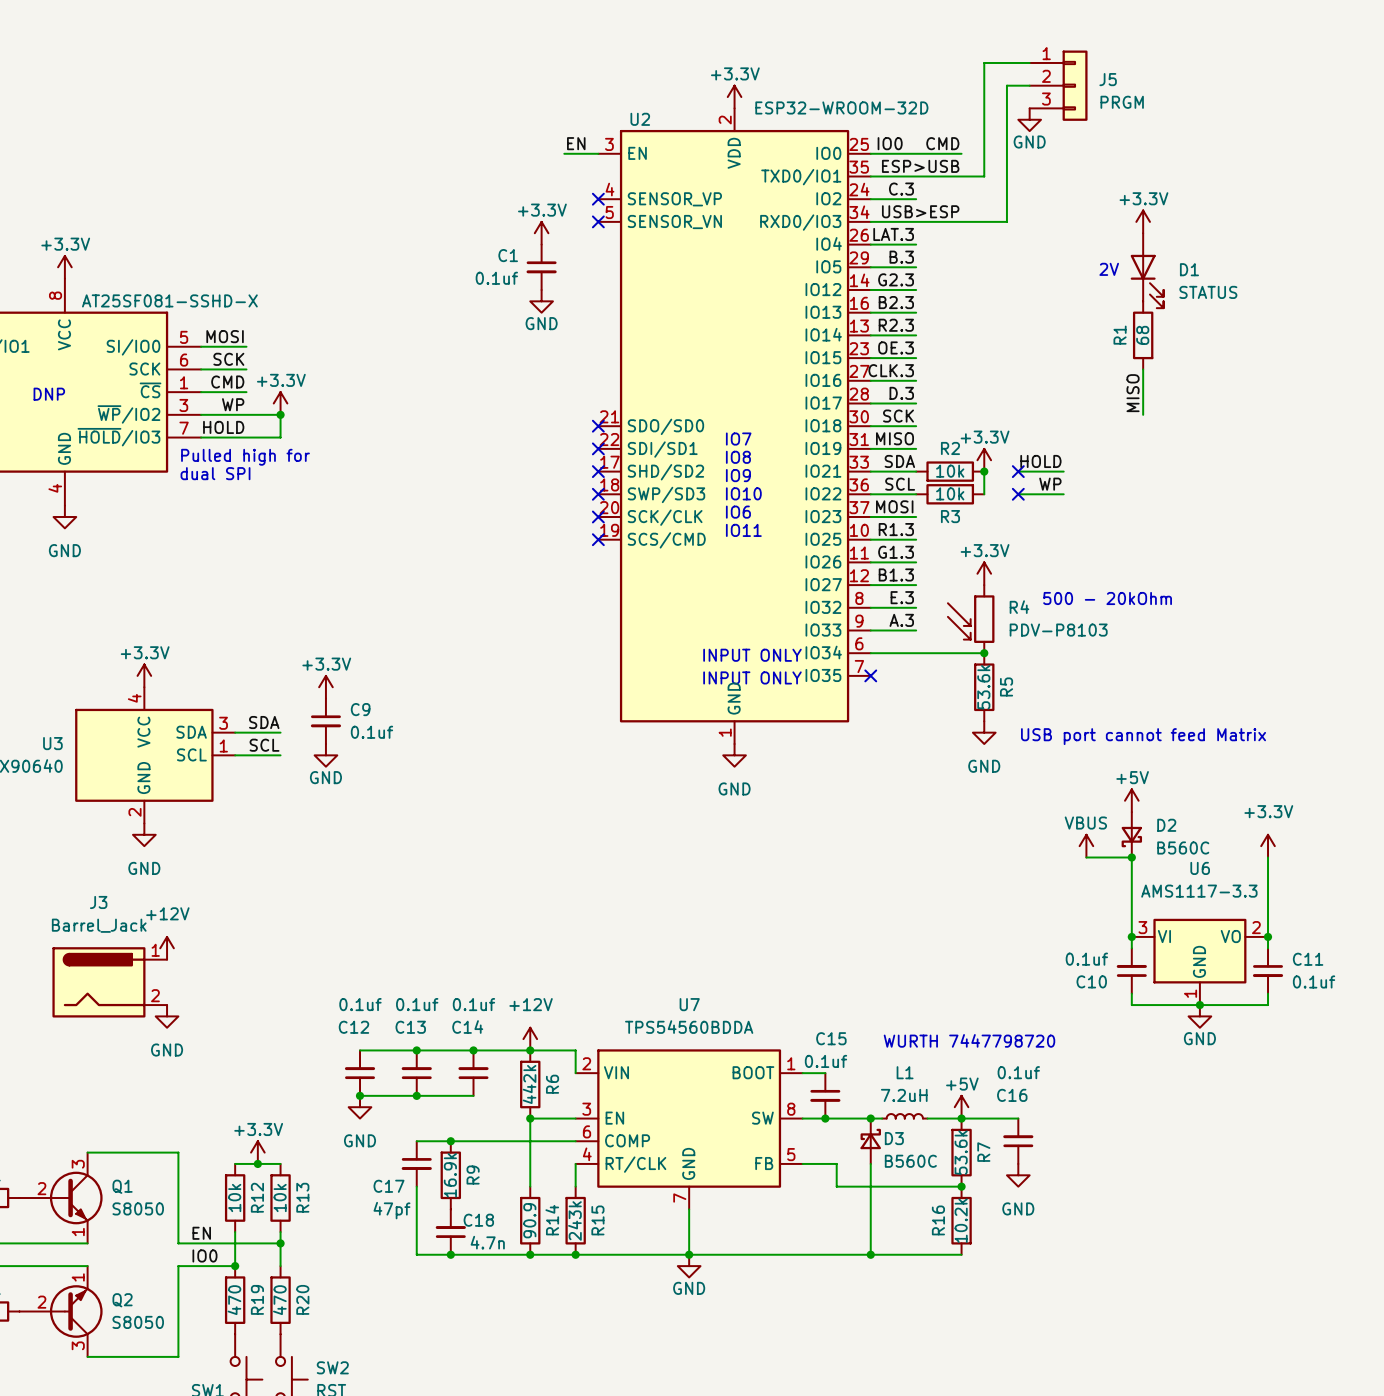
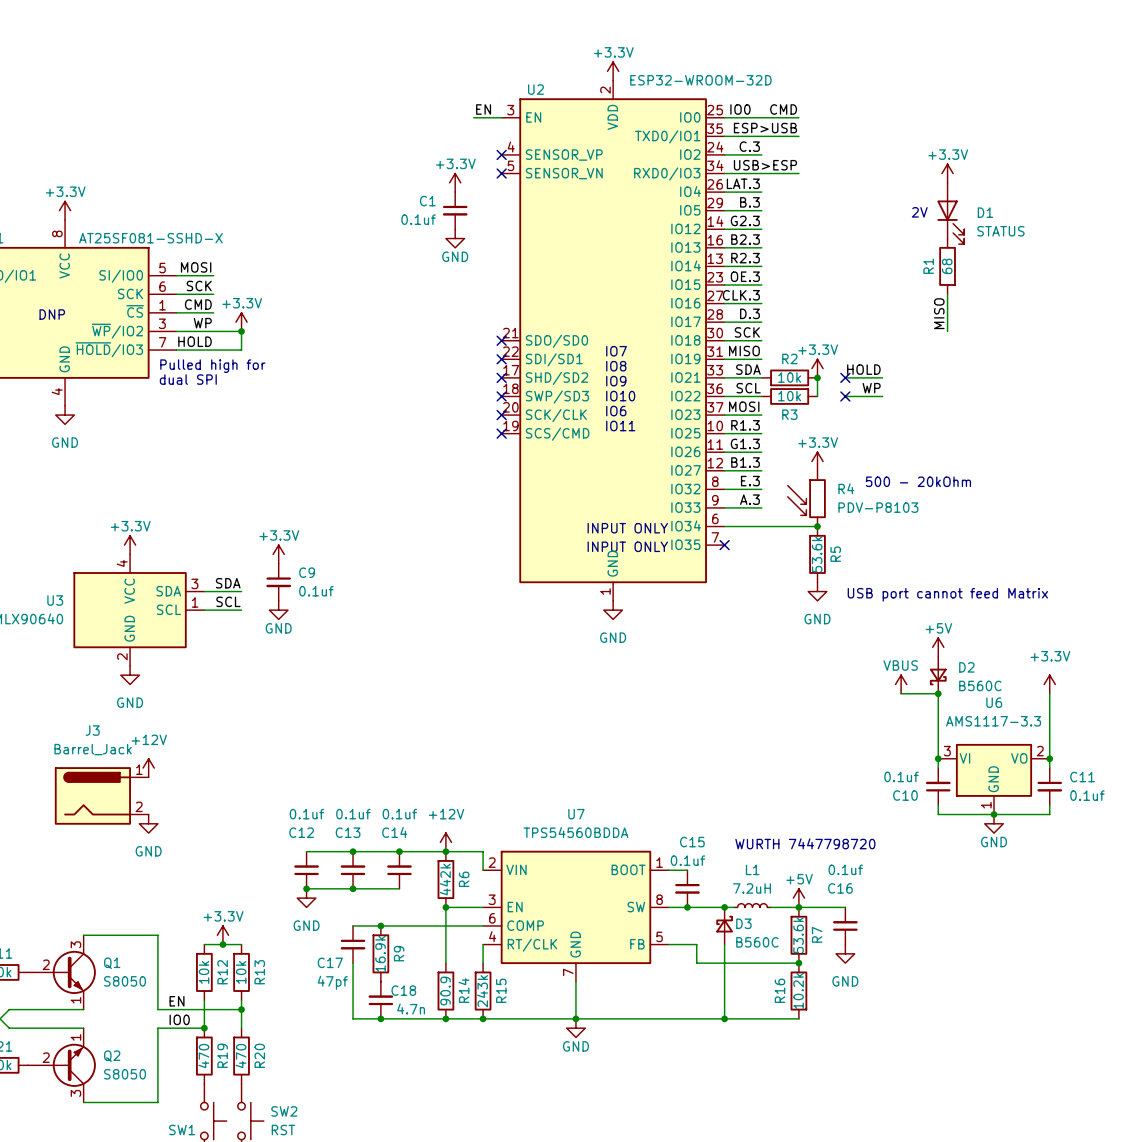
wire: (1029, 62) (984, 62) (984, 176) (961, 176) -> none
wire: (1029, 85) (1006, 85) (1006, 221) (961, 221) -> none
J5: PRGM (1058, 85) -> none
power symbol: GND (1029, 119) -> none

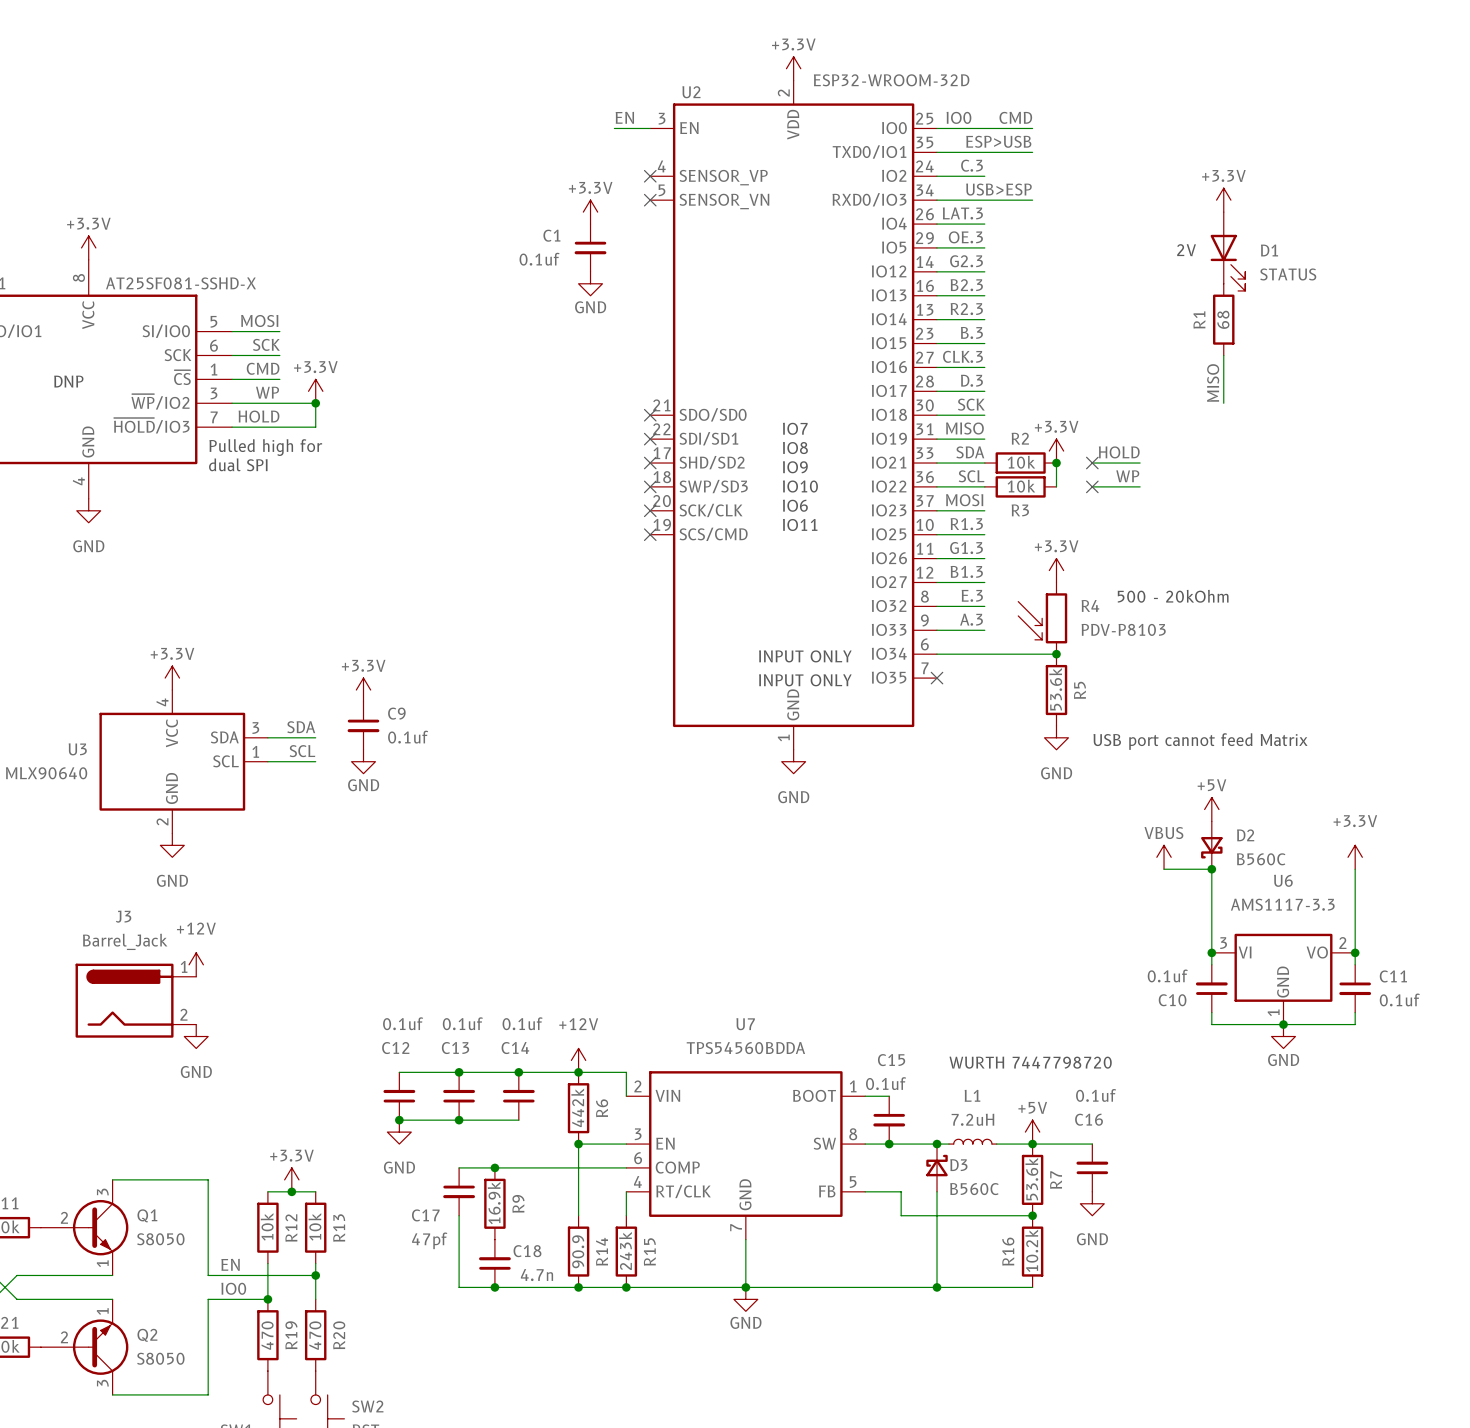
label: B.3 (749, 202) -> OE.3 (965, 237)
label: OE.3 (745, 276) -> B.3 (971, 332)

